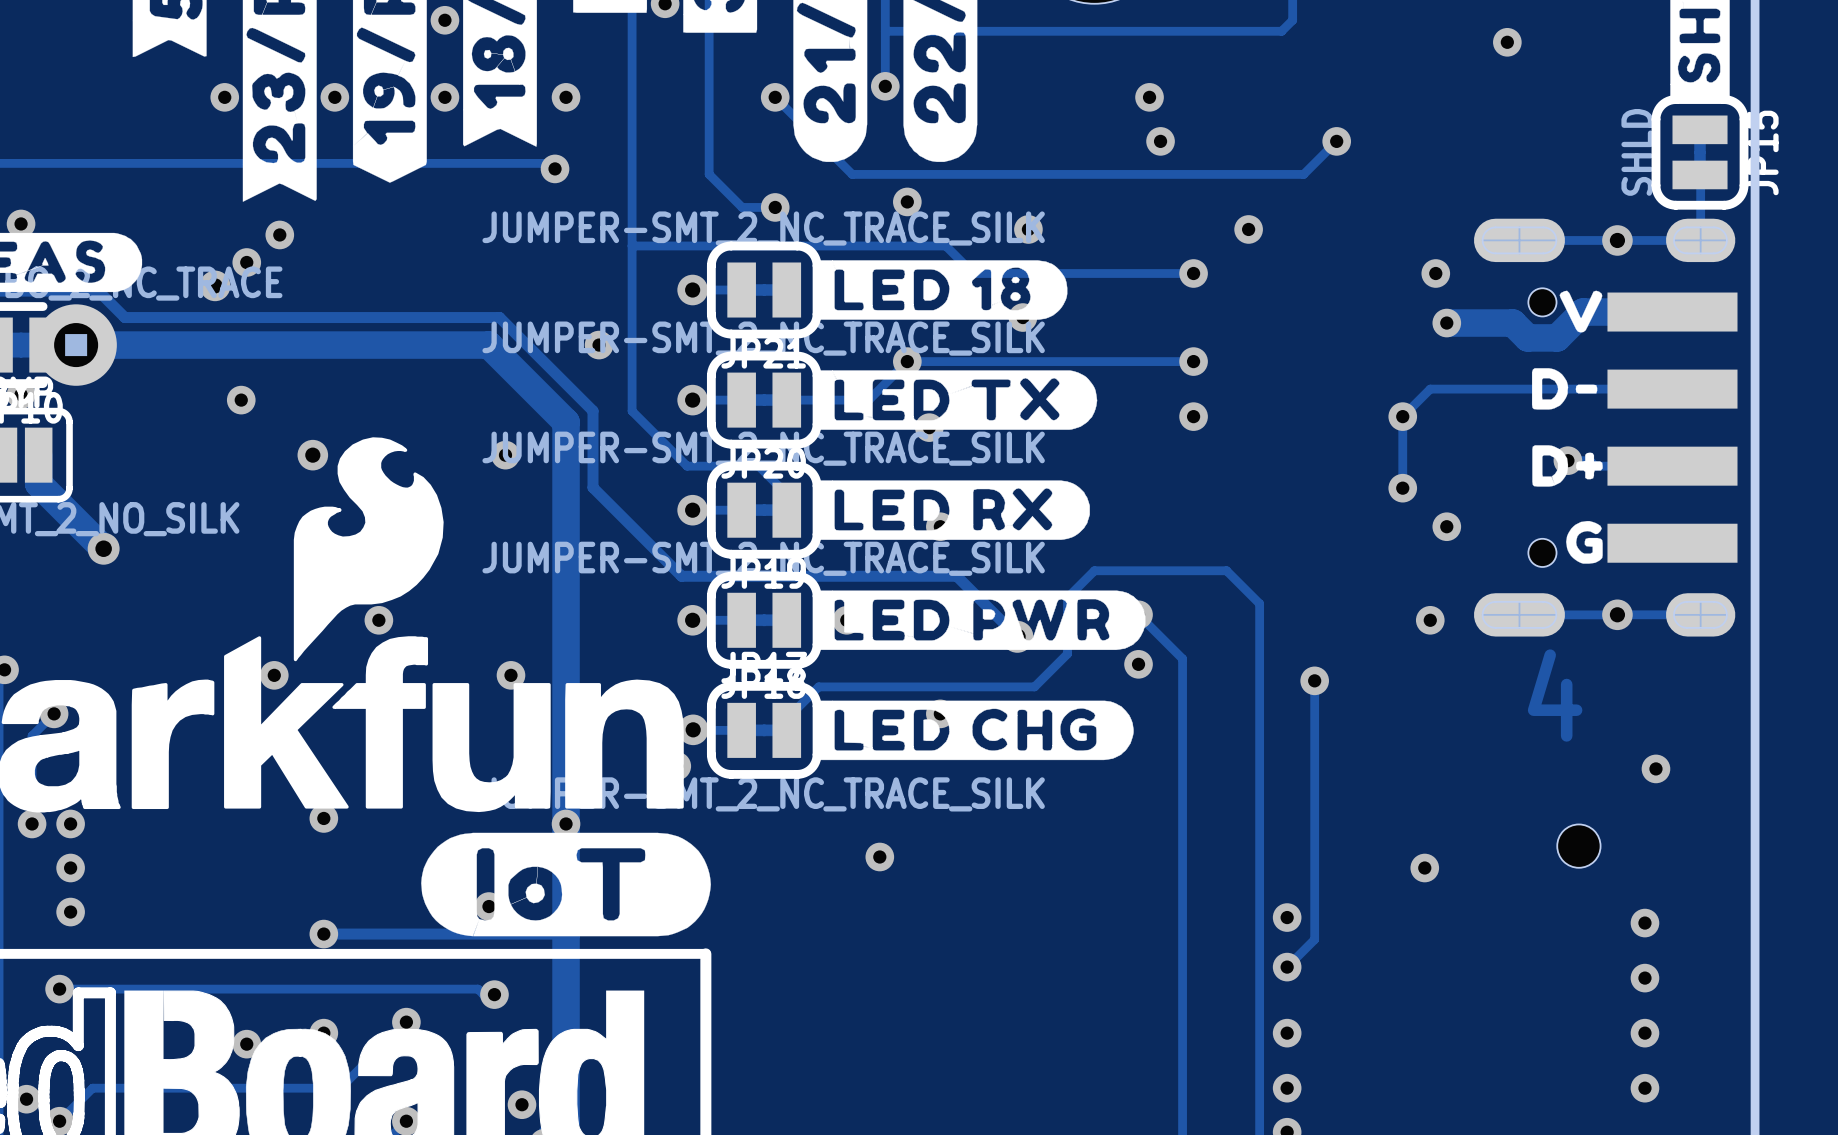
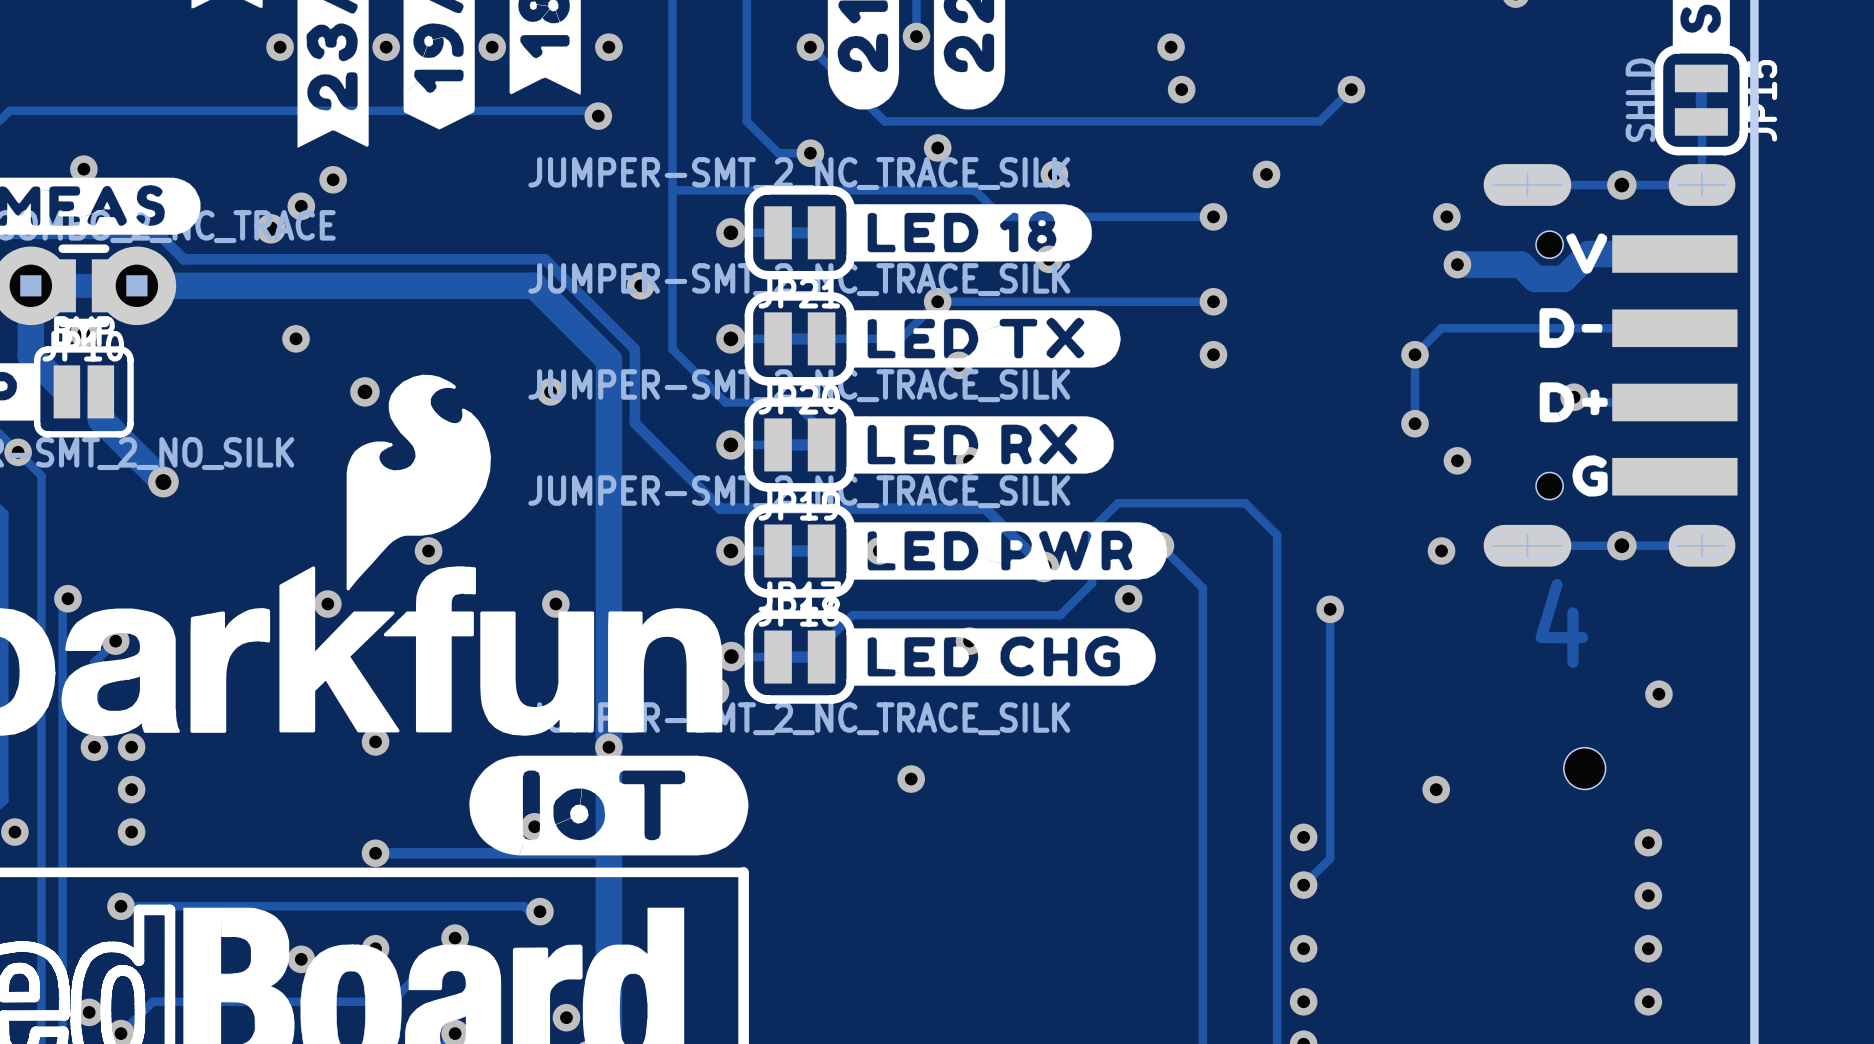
via position: (1138, 664) -> (1128, 598)

